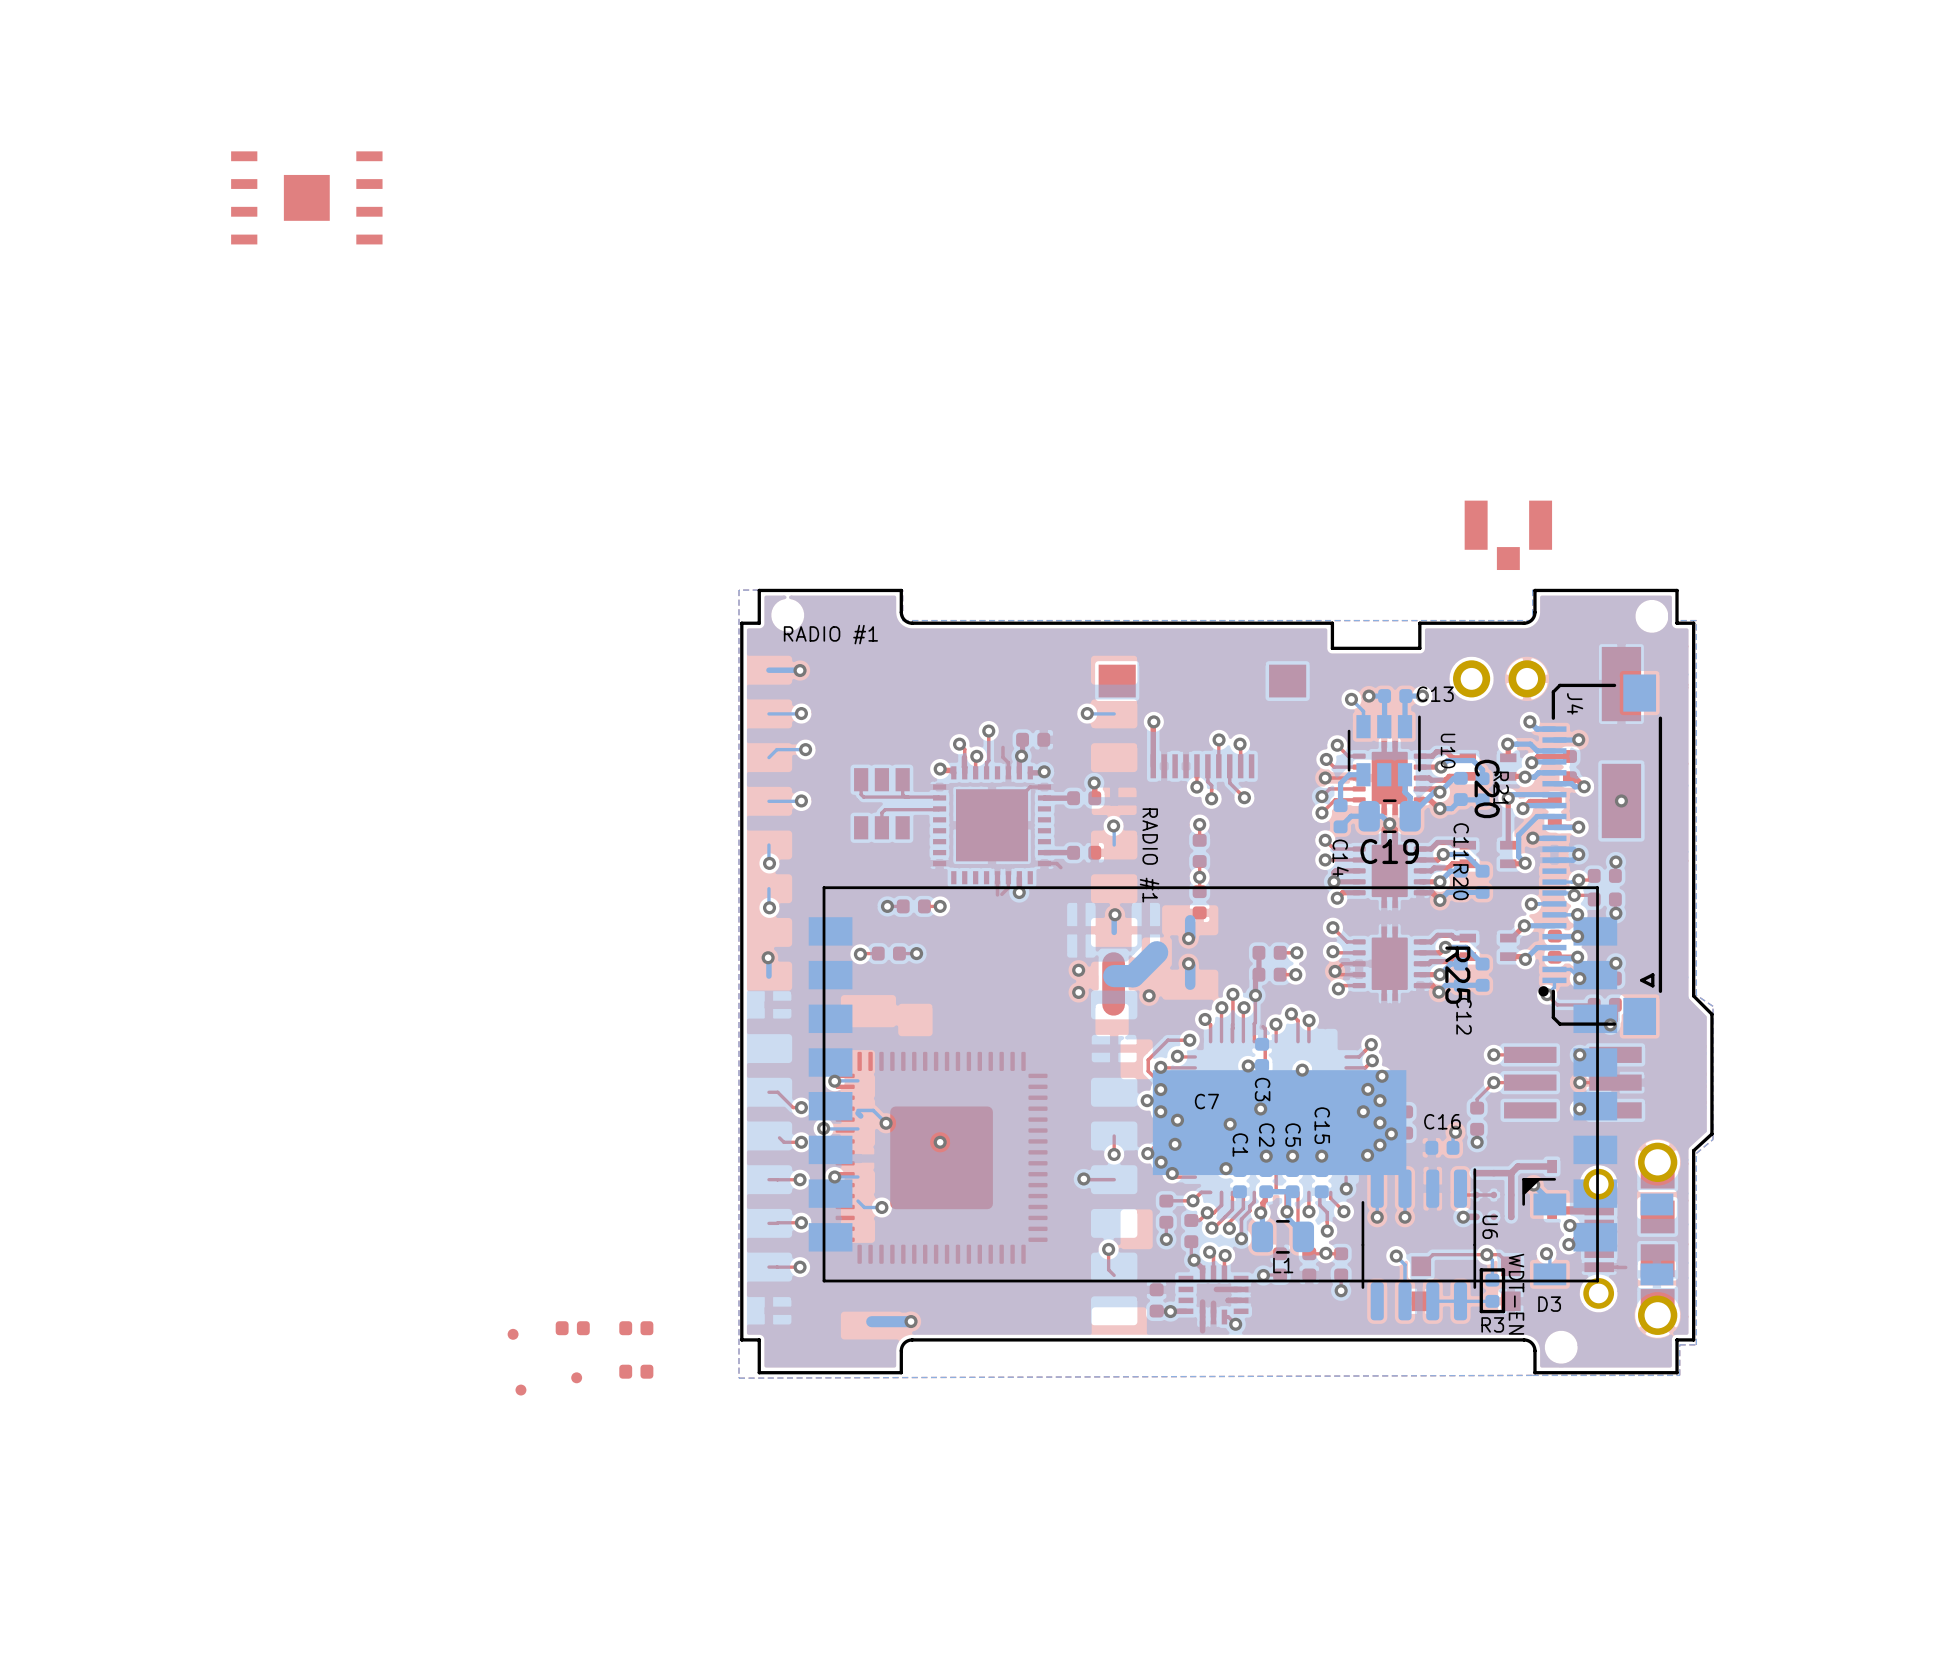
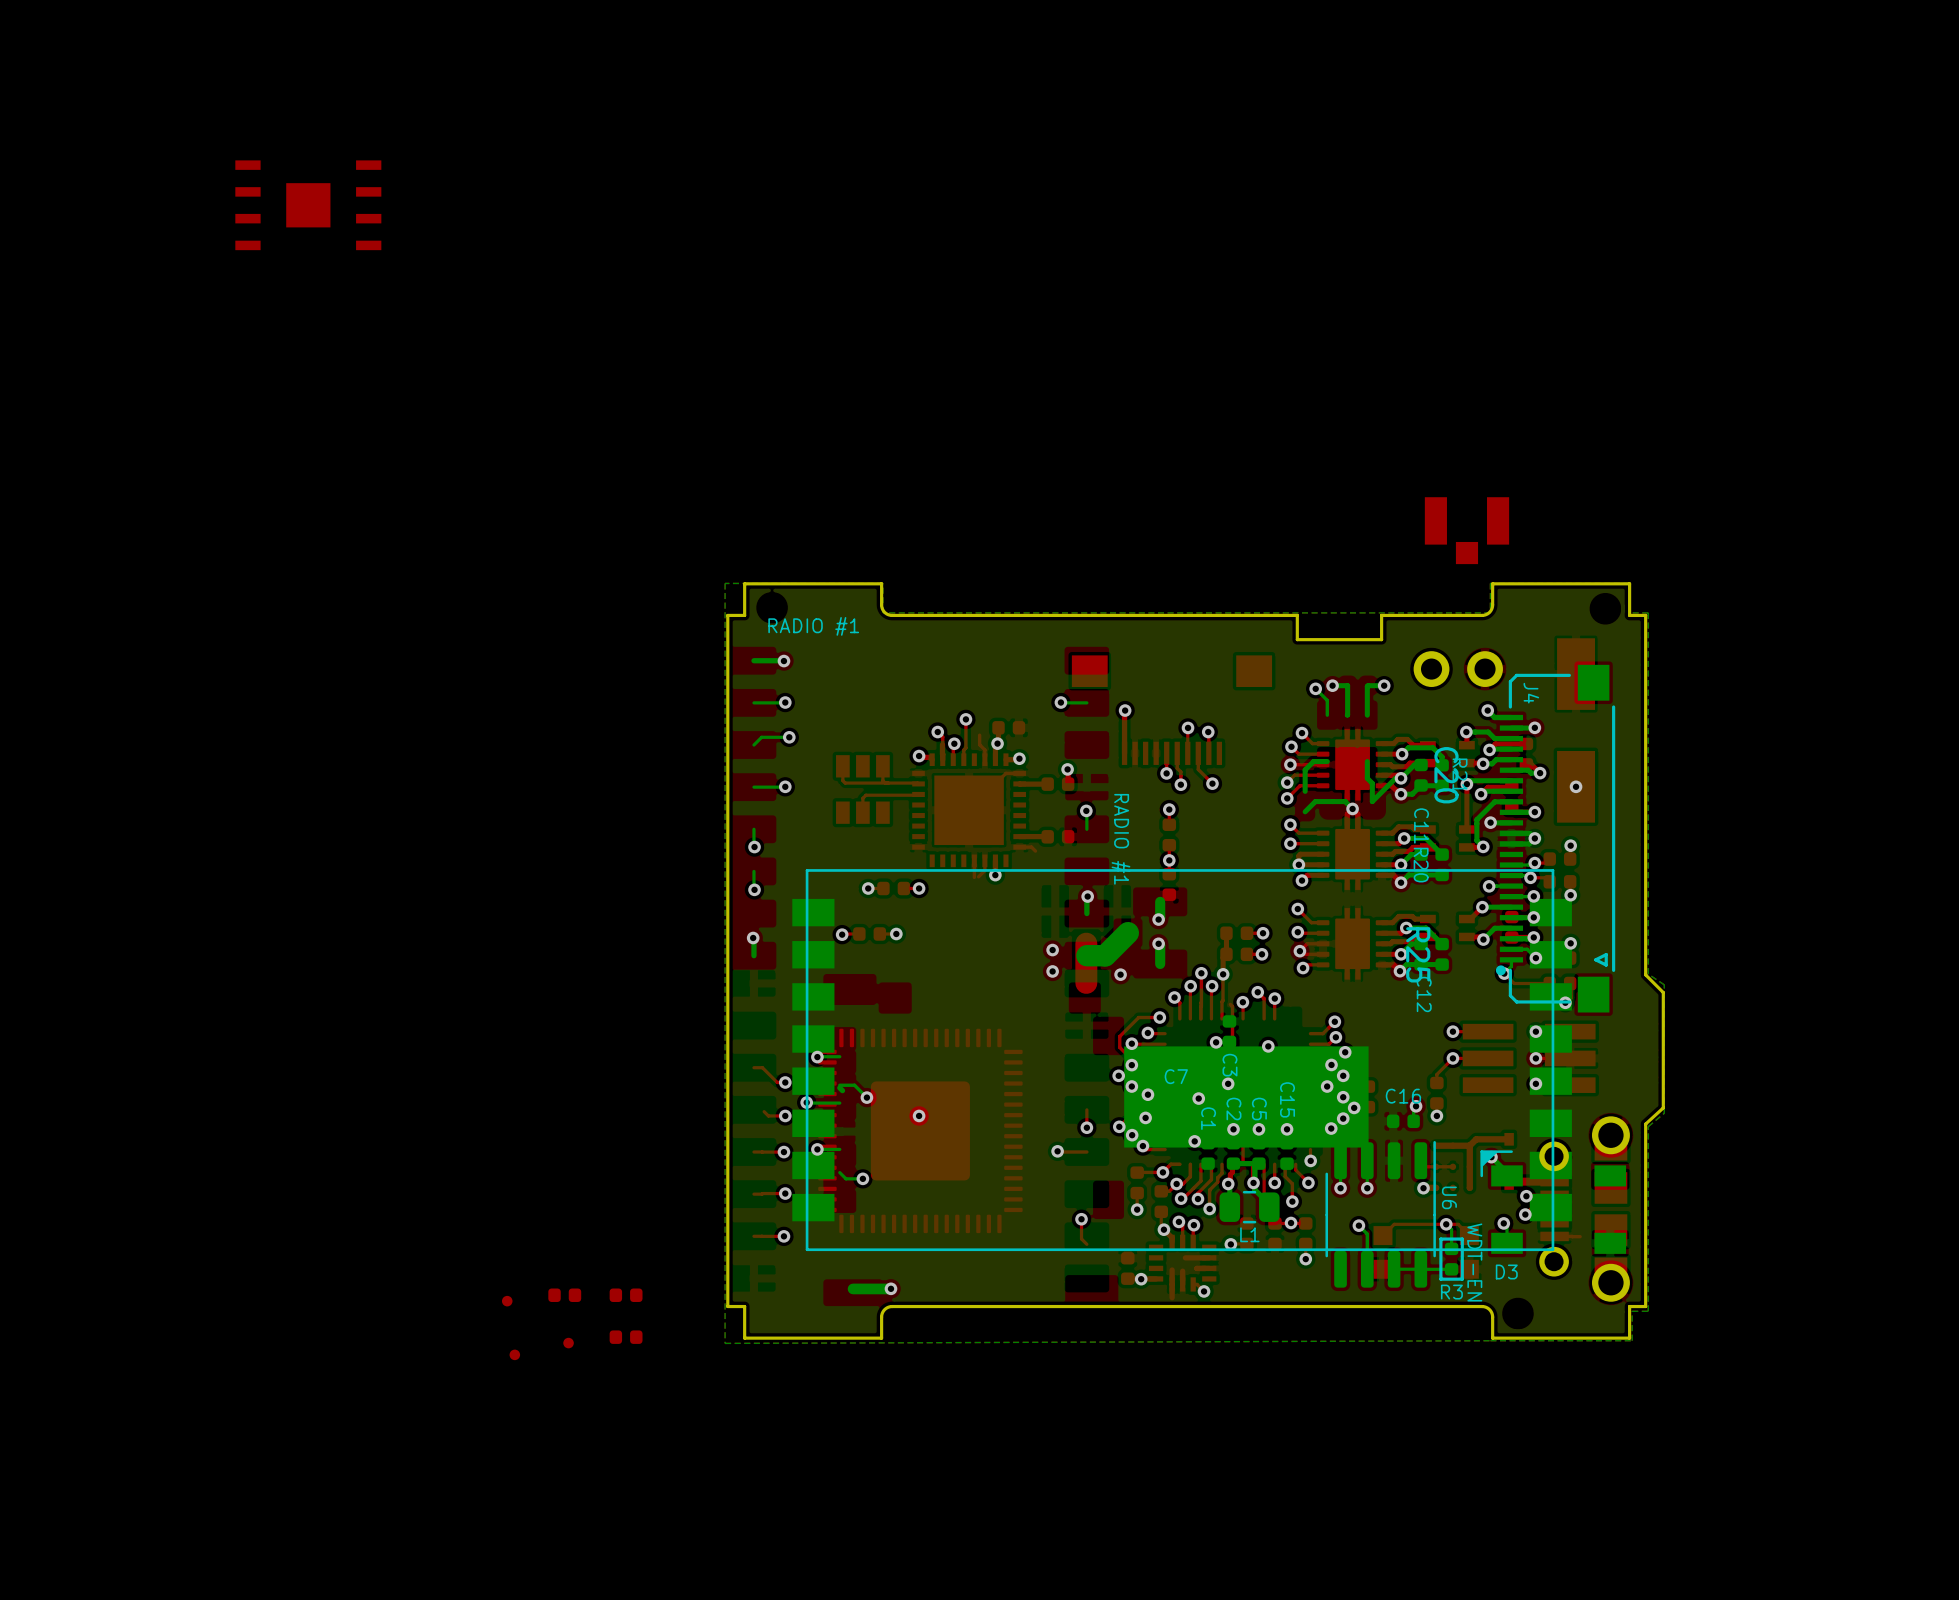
C13: (1395, 696) -> none
U10: (1384, 750) -> none
C14: (1340, 816) -> none
C19: (1389, 816) -> none

